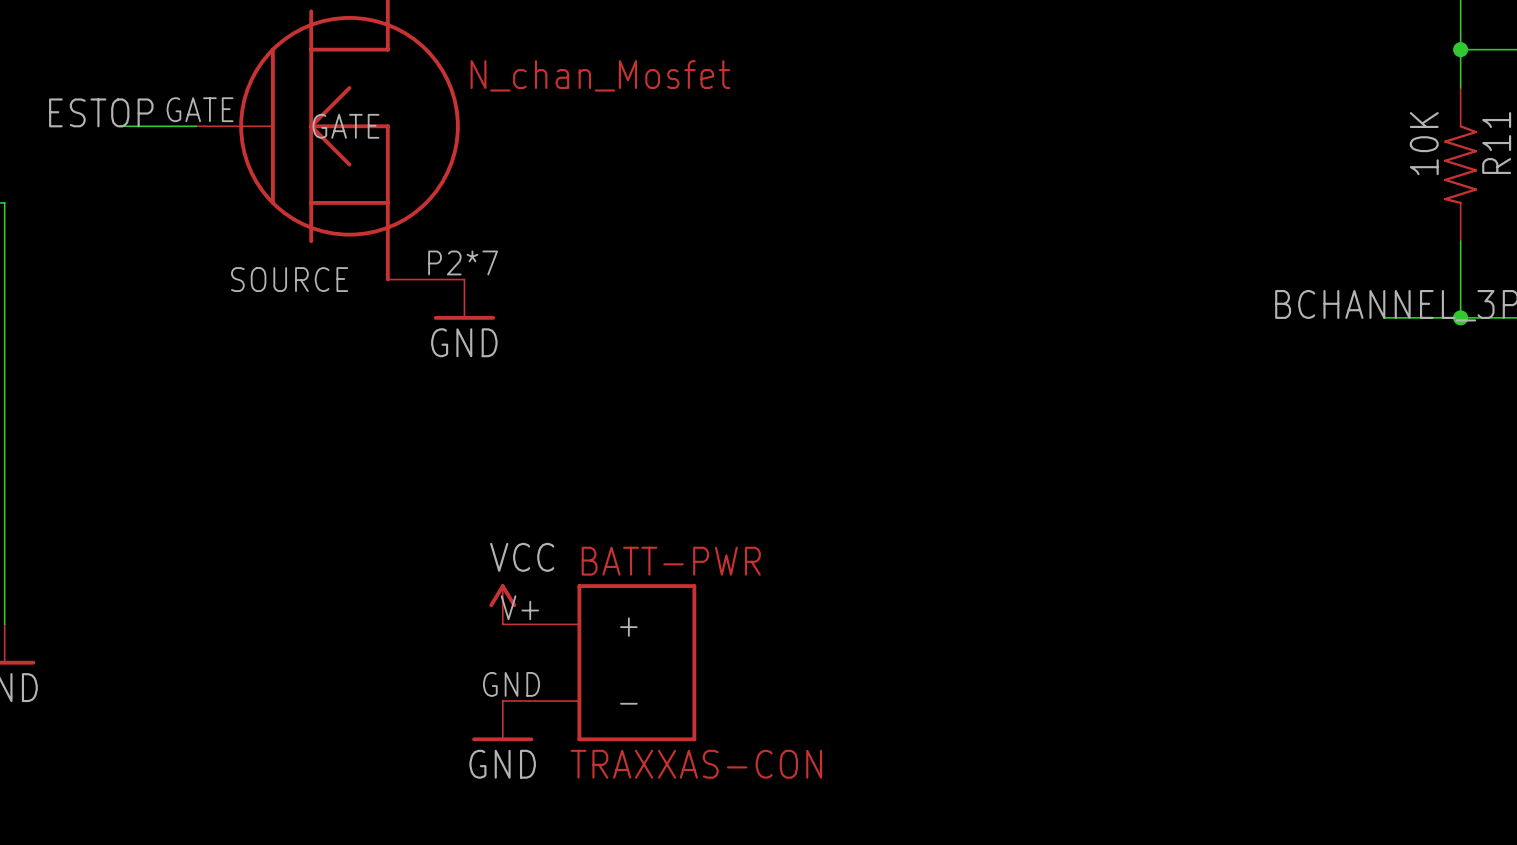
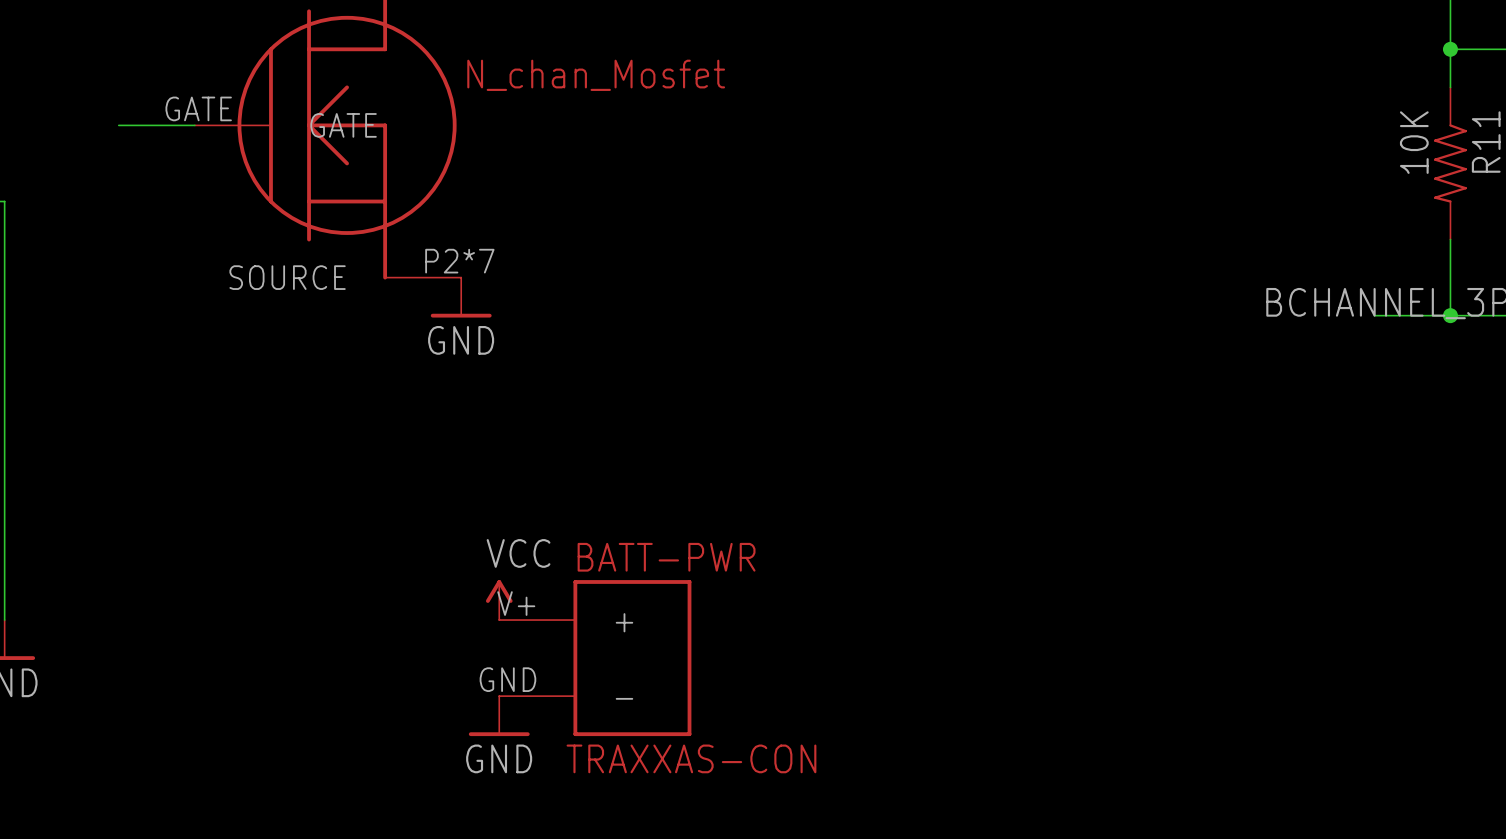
label: ESTOP (101, 112) -> none

